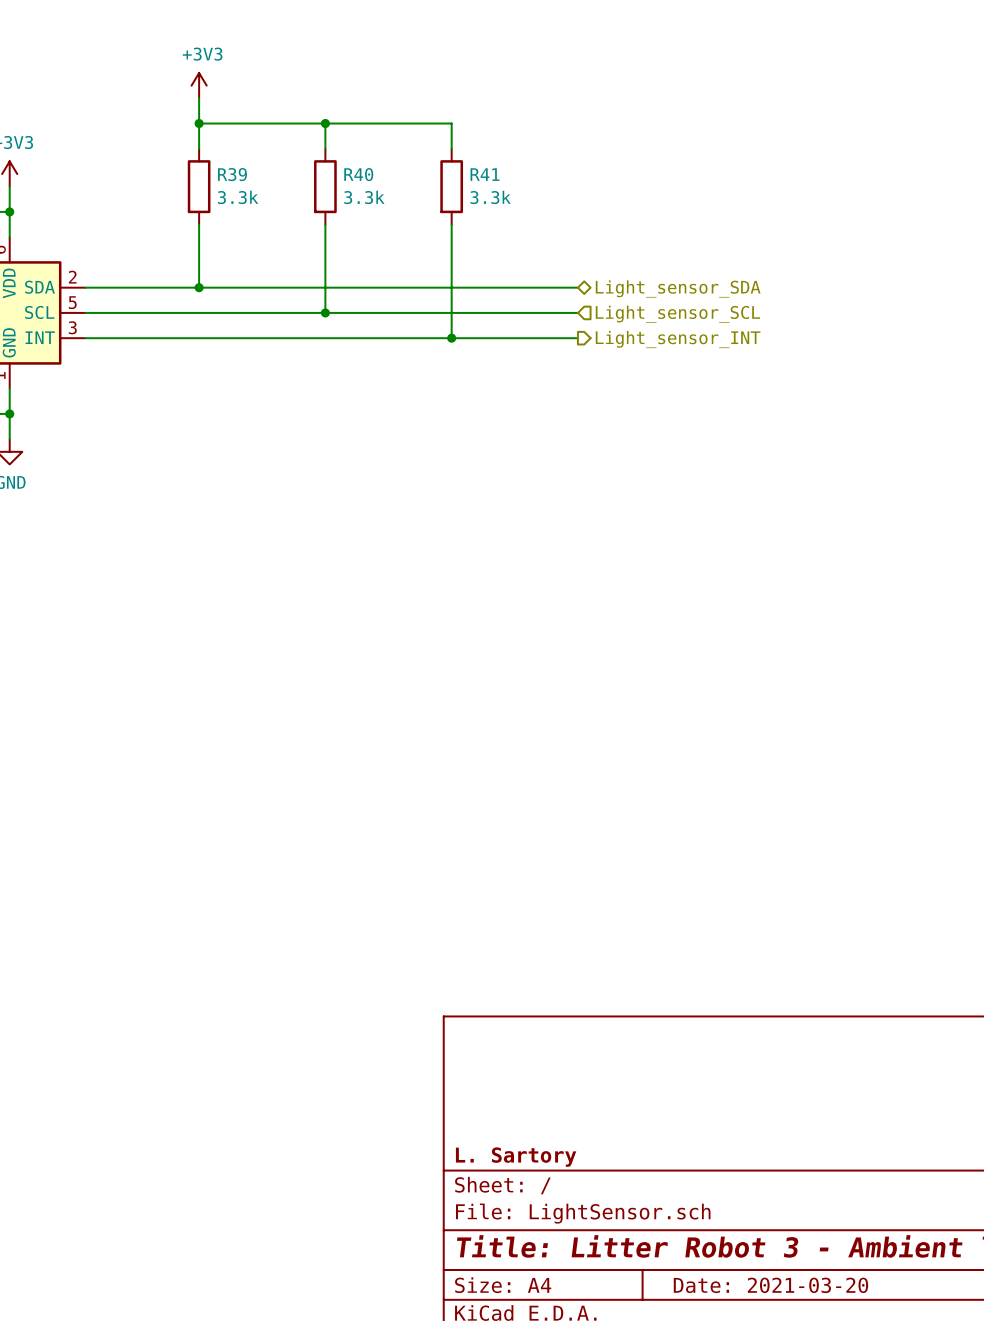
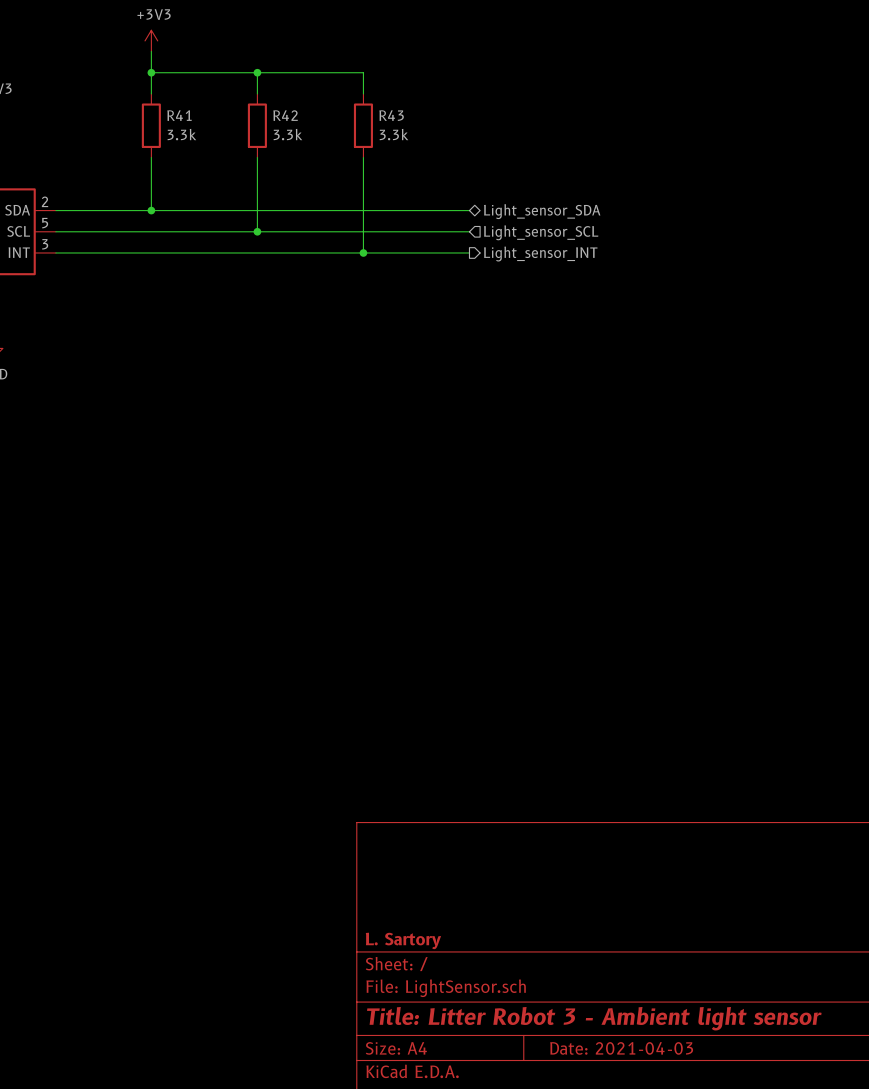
R39 name: R39 (232, 174) -> R41 (179, 115)
R40 name: R40 (358, 174) -> R42 (285, 115)
R41 name: R41 (485, 174) -> R43 (391, 115)
title block: Date: 2021-03-20 (770, 1285) -> Date: 2021-04-03 (621, 1048)

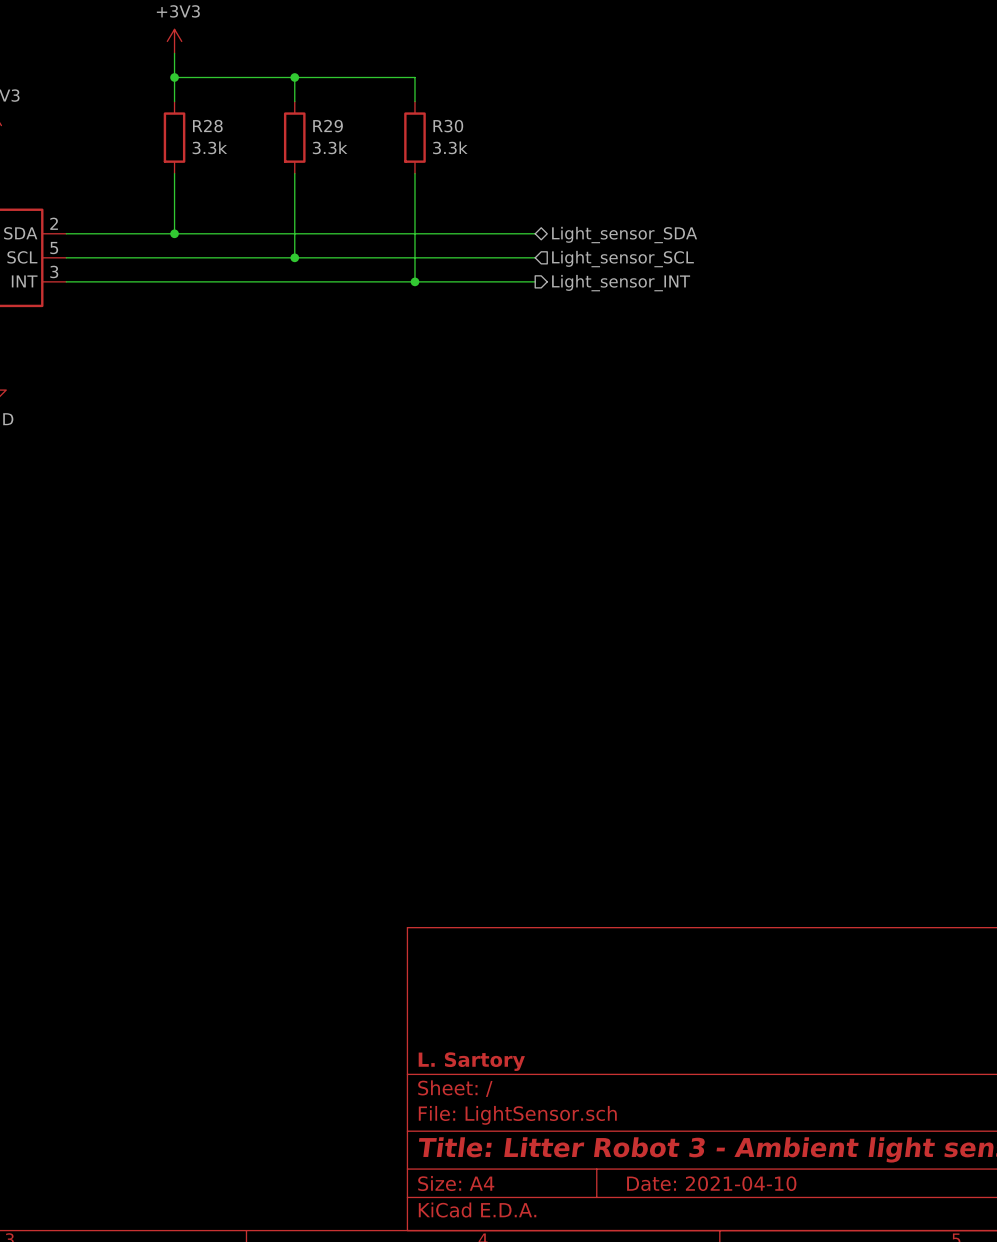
R41 name: R41 (179, 115) -> R28 (207, 126)
R42 name: R42 (285, 115) -> R29 (328, 126)
R43 name: R43 (391, 115) -> R30 (448, 126)
title block: Date: 2021-04-03 (621, 1048) -> Date: 2021-04-10 (711, 1183)

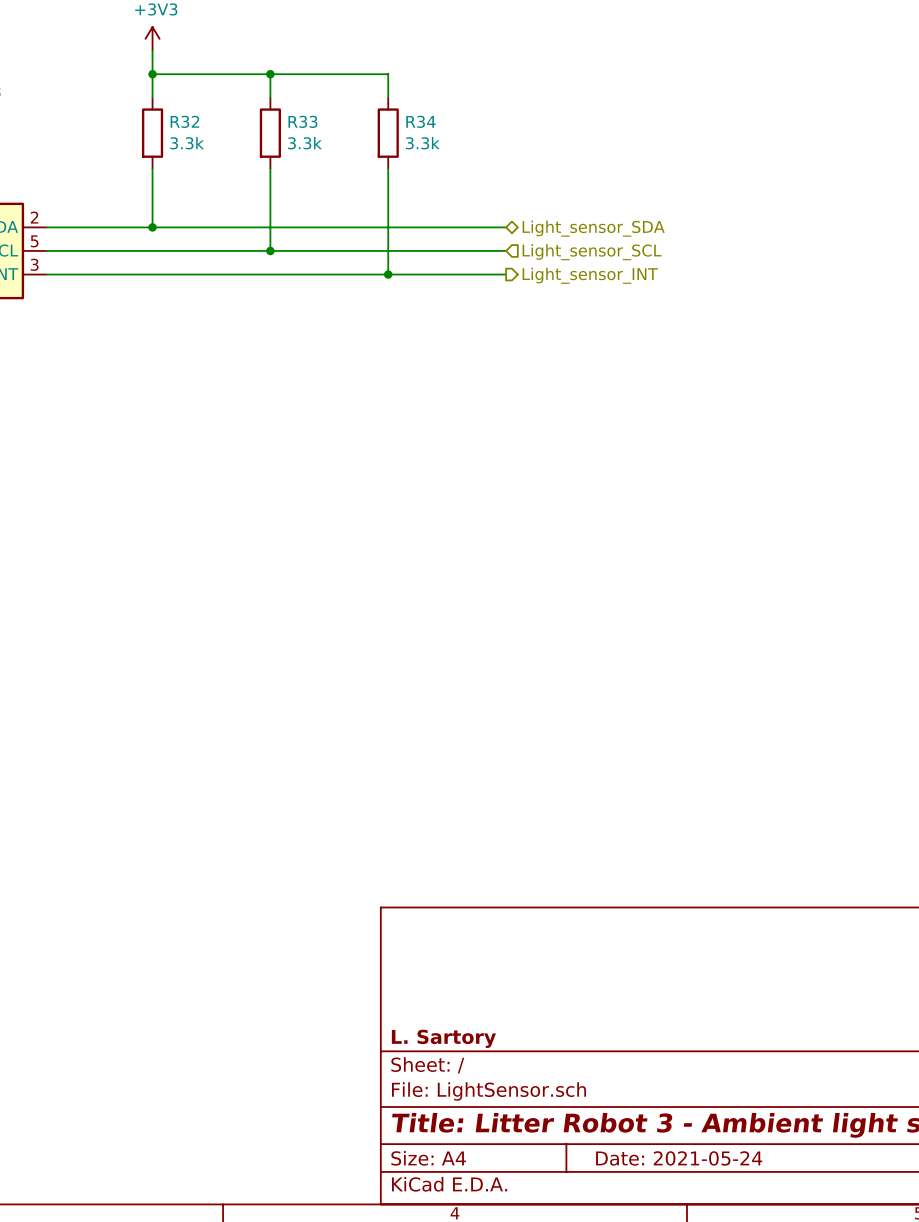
R28 name: R28 (207, 126) -> R32 (184, 121)
R29 name: R29 (328, 126) -> R33 (302, 121)
R30 name: R30 (448, 126) -> R34 (420, 121)
title block: Date: 2021-04-10 (711, 1183) -> Date: 2021-05-24 (679, 1158)

